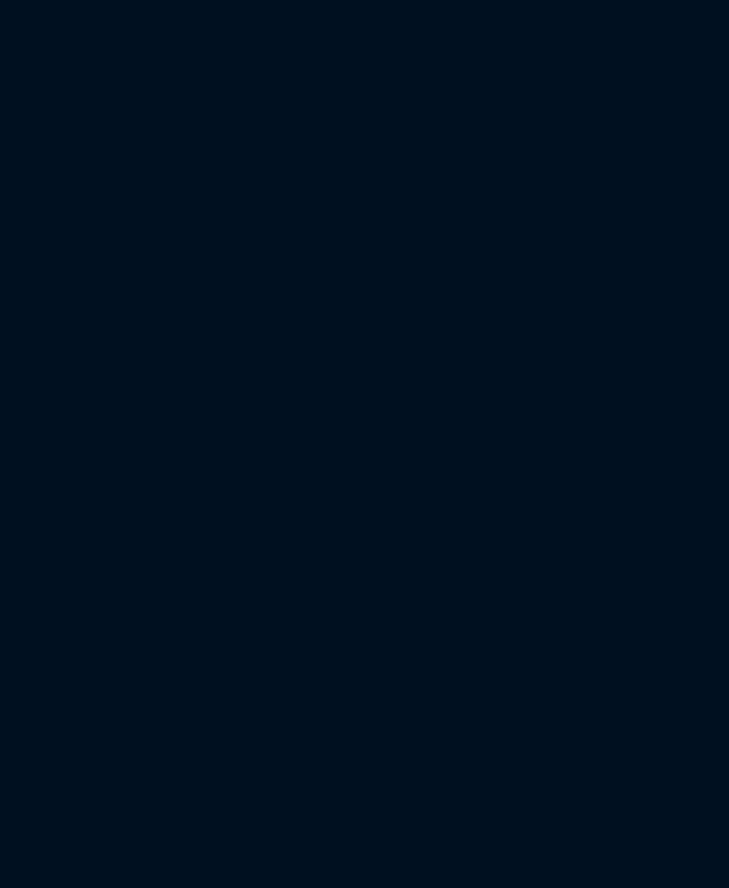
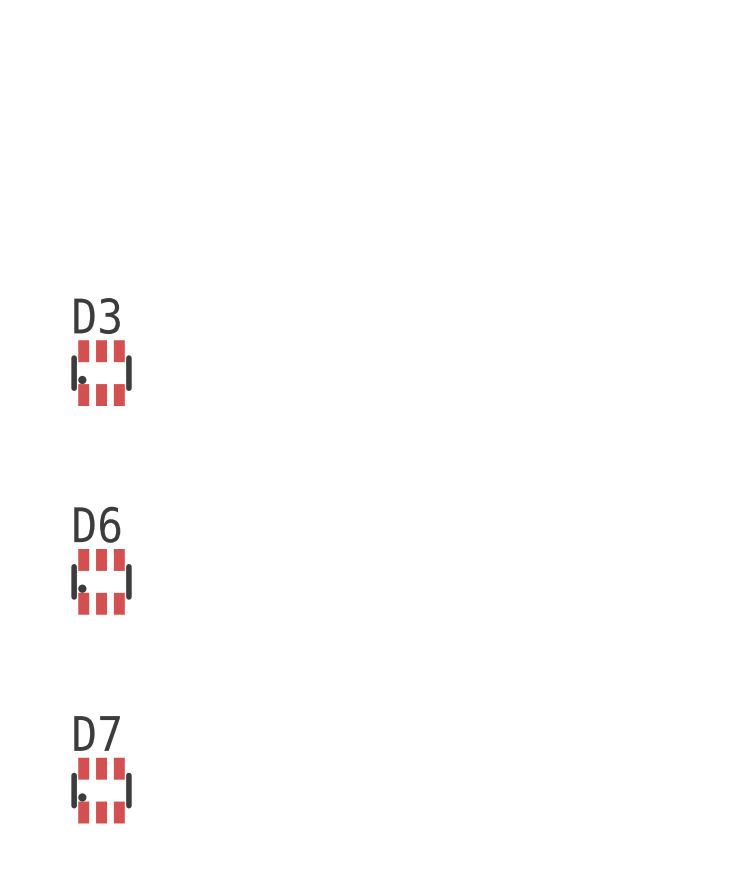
D3: none -> (101, 373)
D6: none -> (101, 581)
D7: none -> (101, 790)

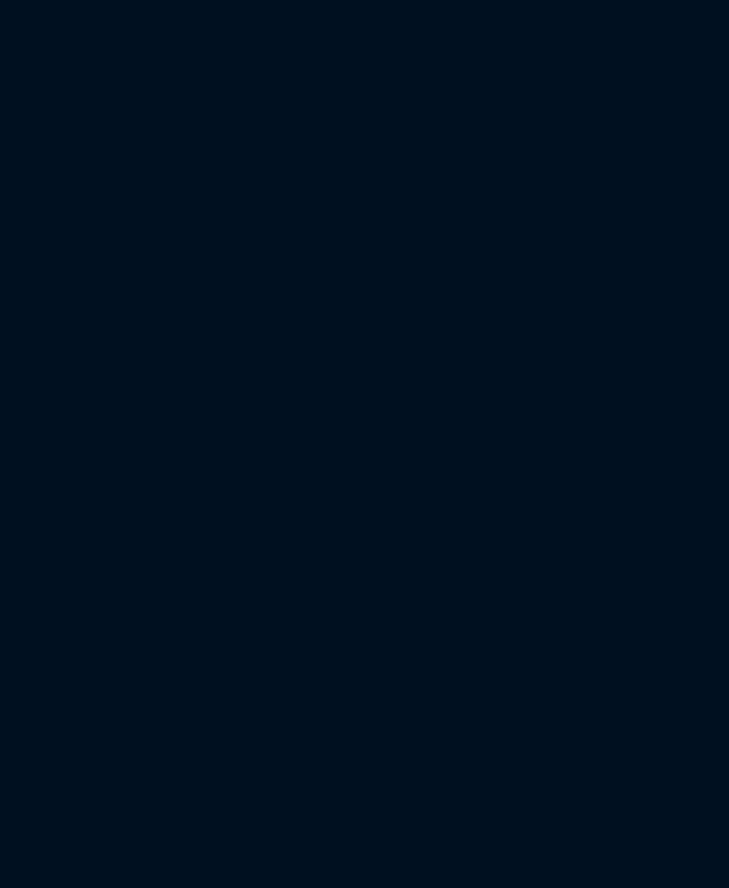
D3: (101, 373) -> none
D6: (101, 581) -> none
D7: (101, 790) -> none

